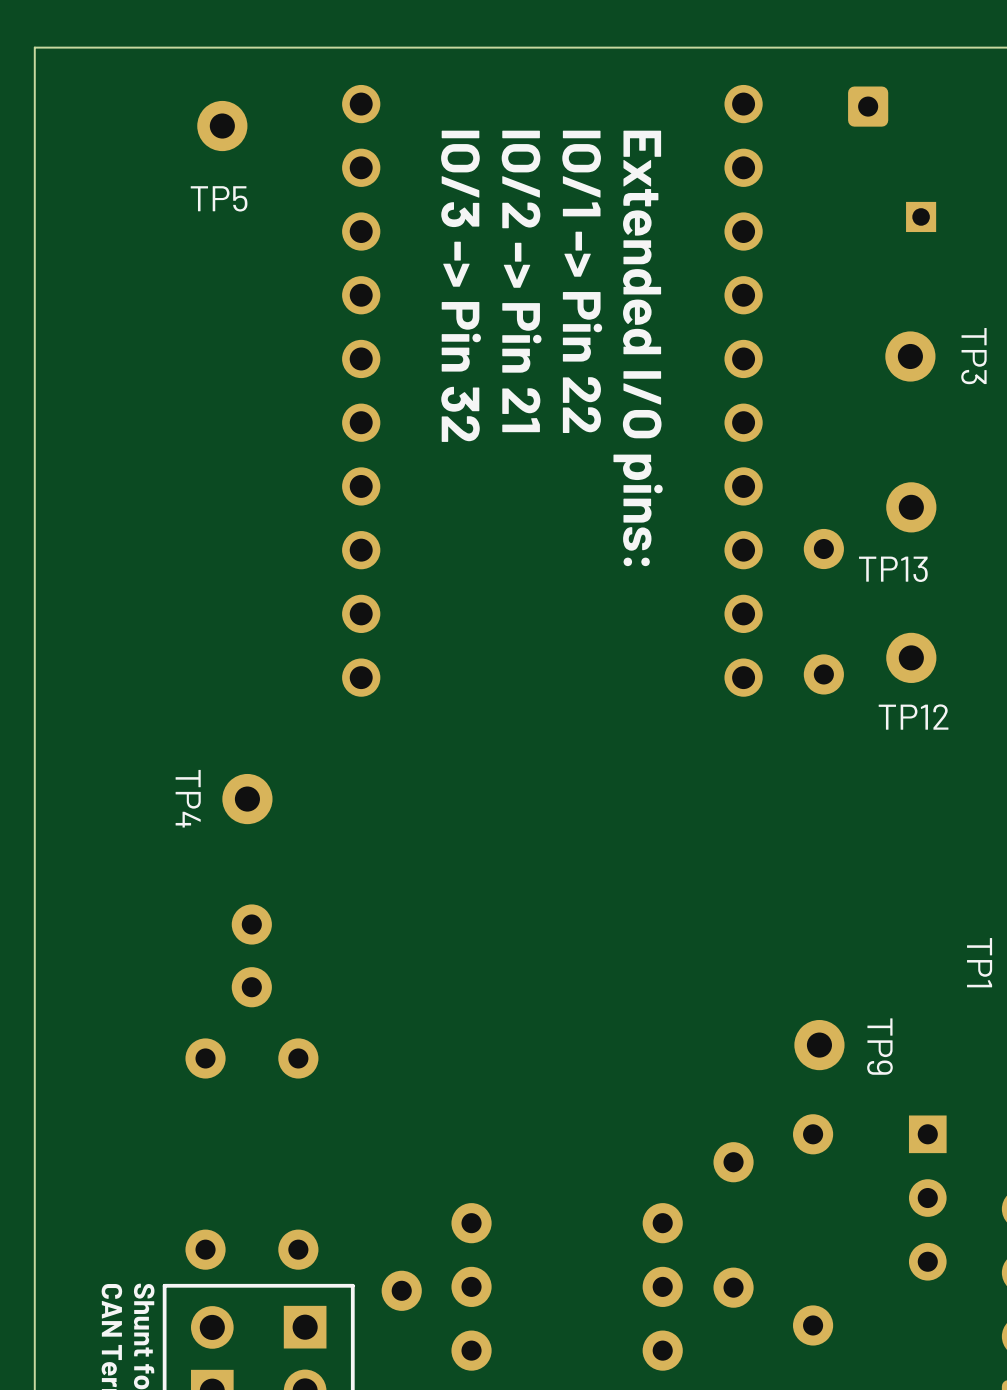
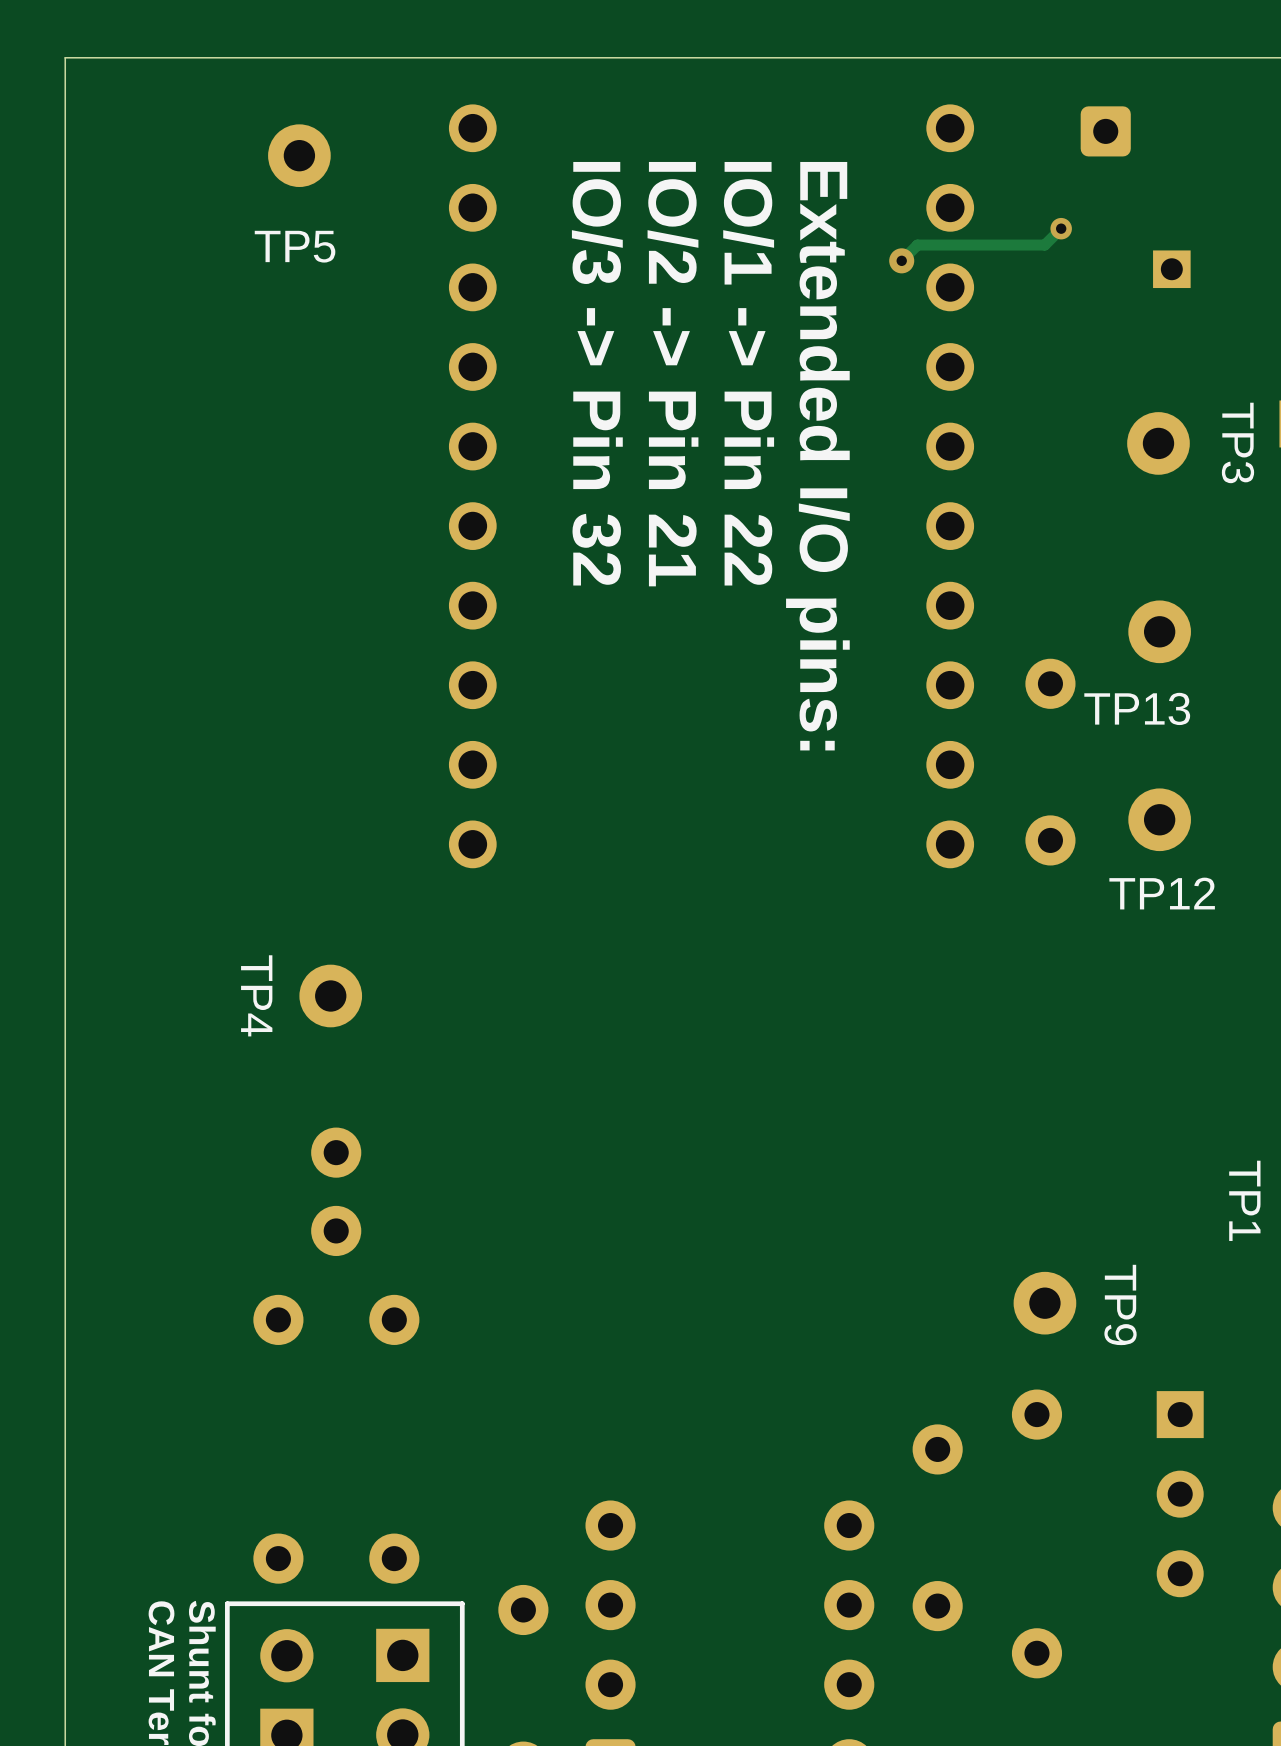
track: none -> (1061, 228) (1044, 245) (917, 245) (901, 260)
via: none -> (1061, 228)
via: none -> (901, 260)

